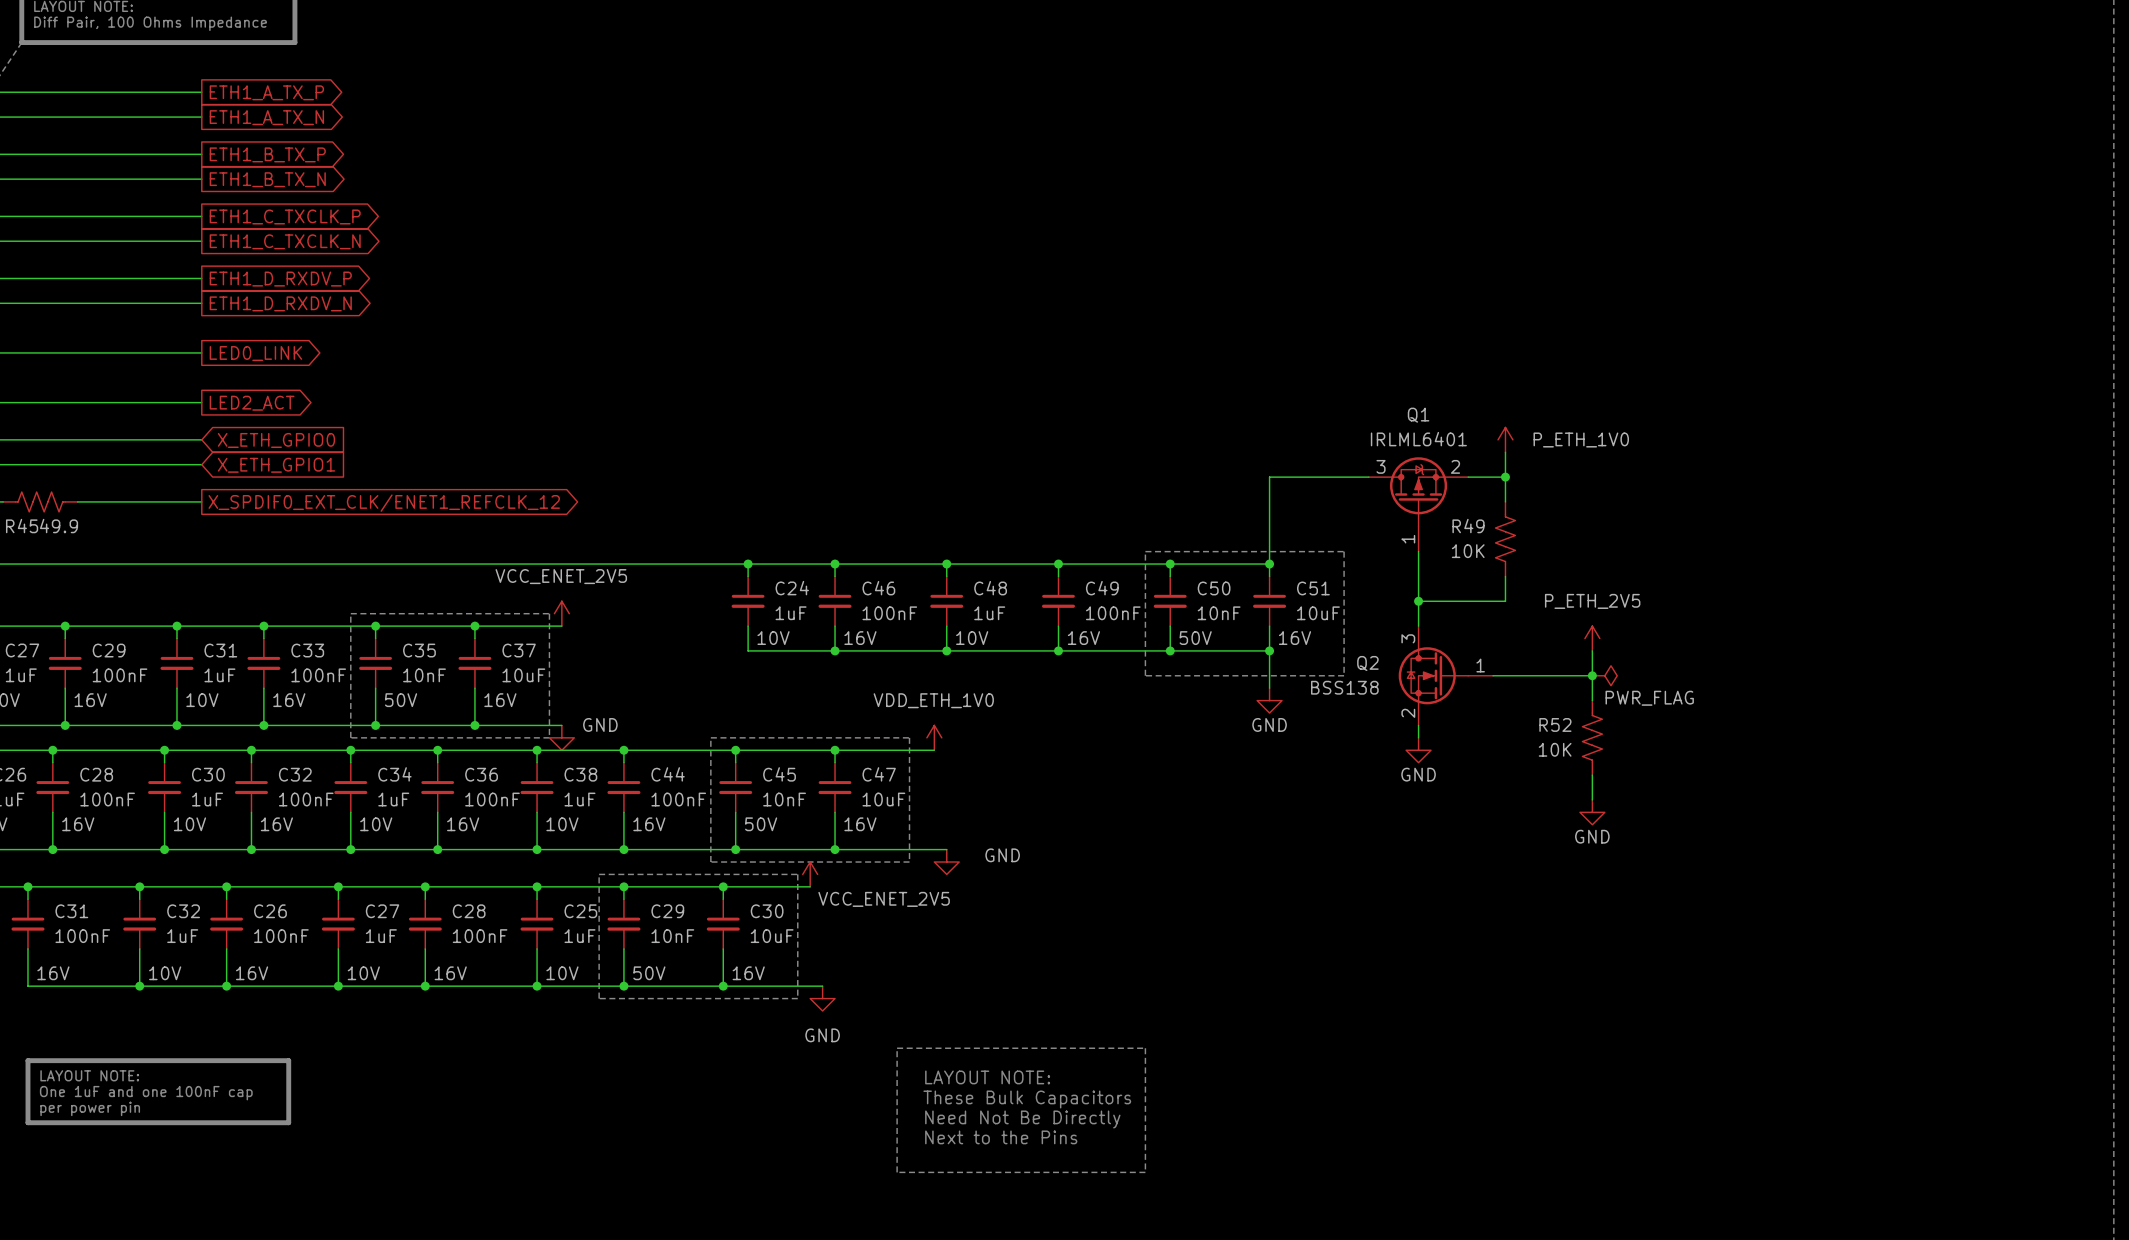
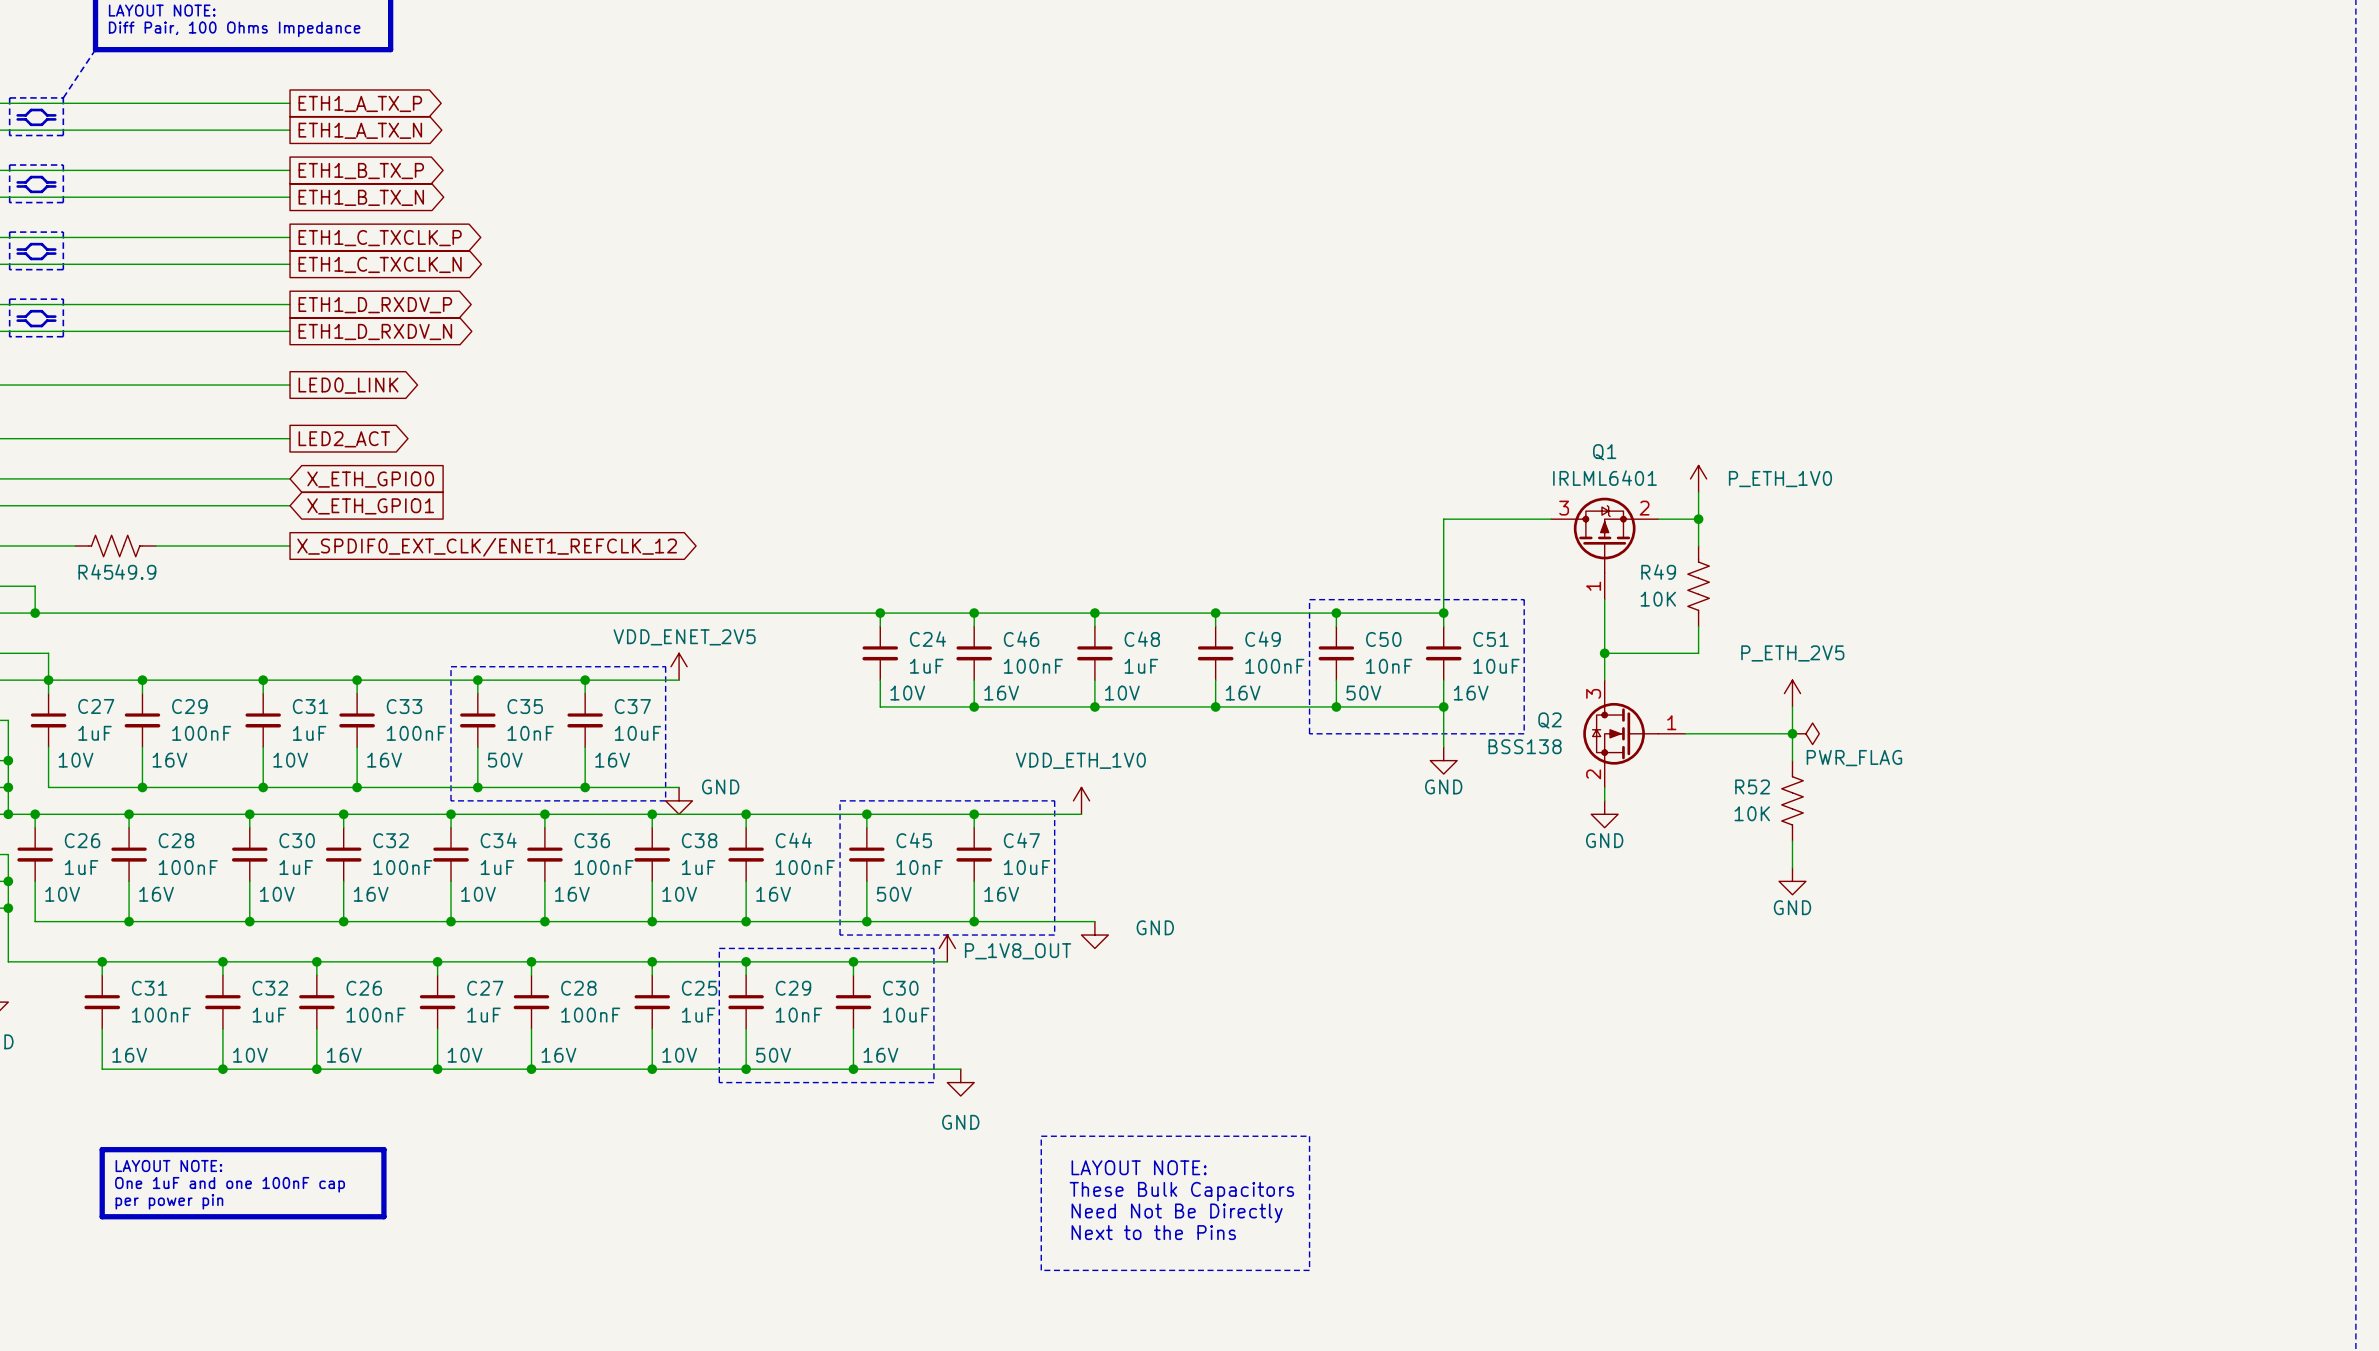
power symbol: VCC_ENET_2V5 (561, 613) -> VDD_ENET_2V5 (679, 666)
power symbol: VCC_ENET_2V5 (810, 874) -> P_1V8_OUT (947, 948)

